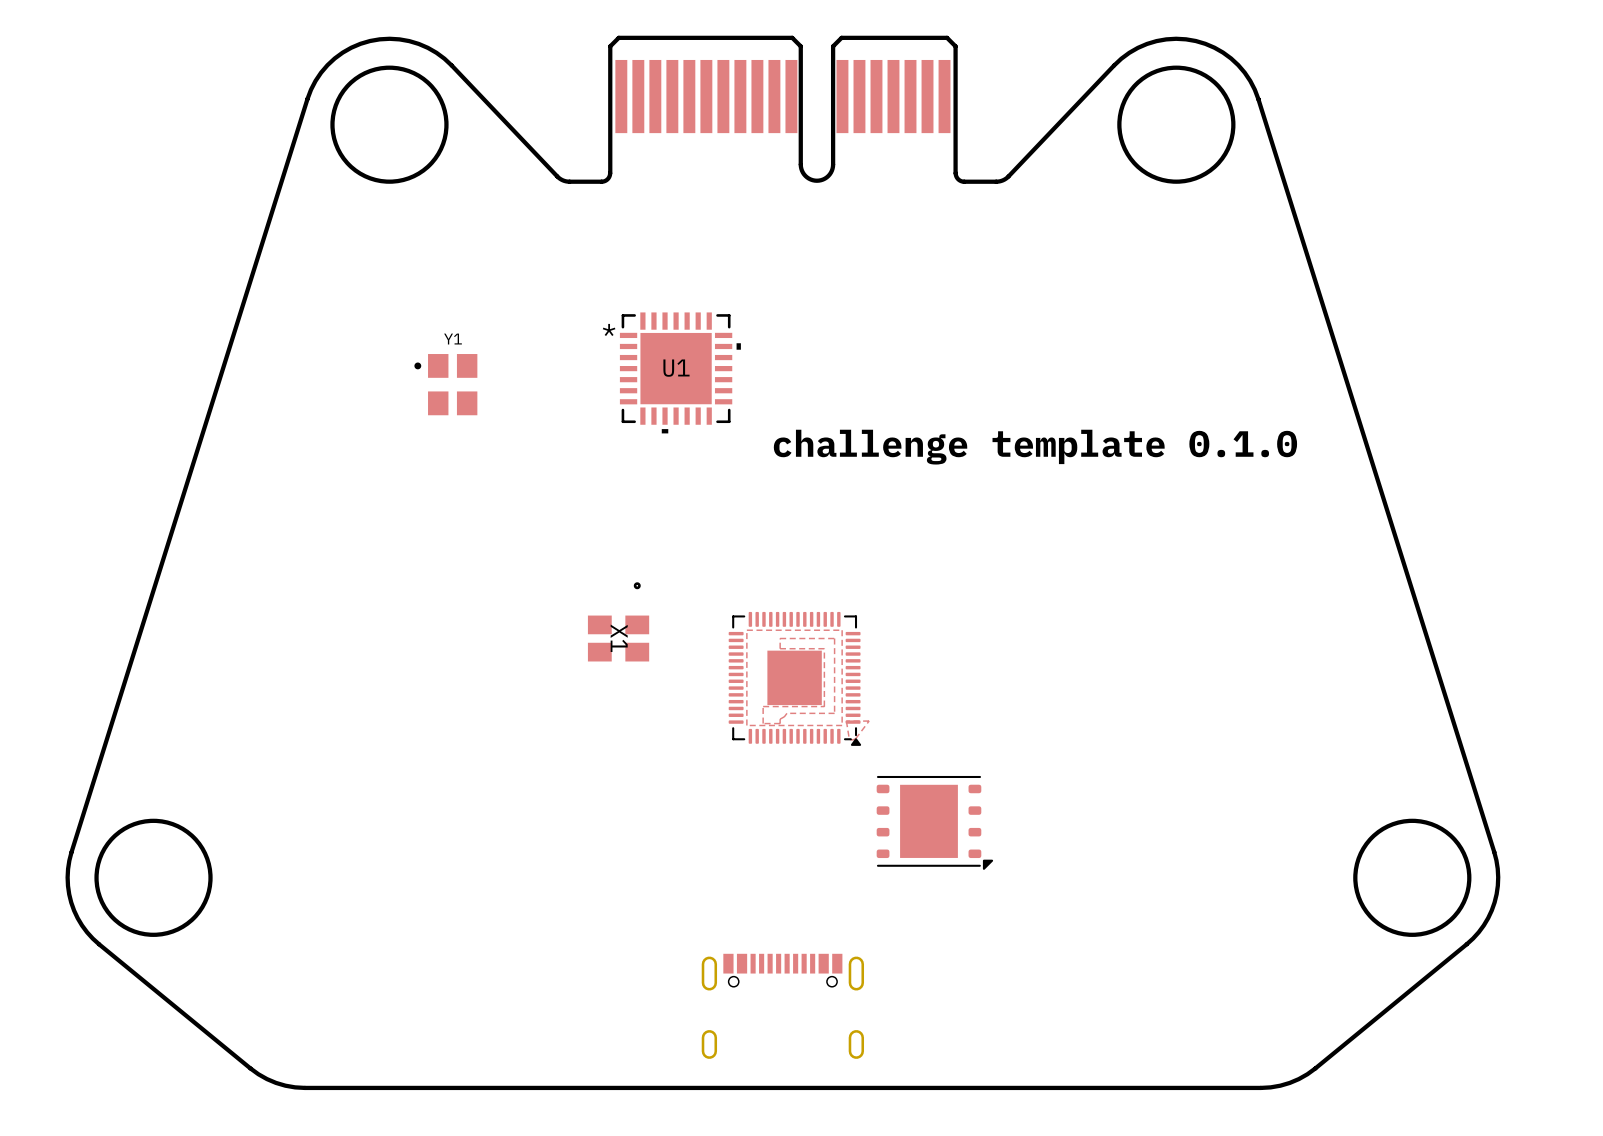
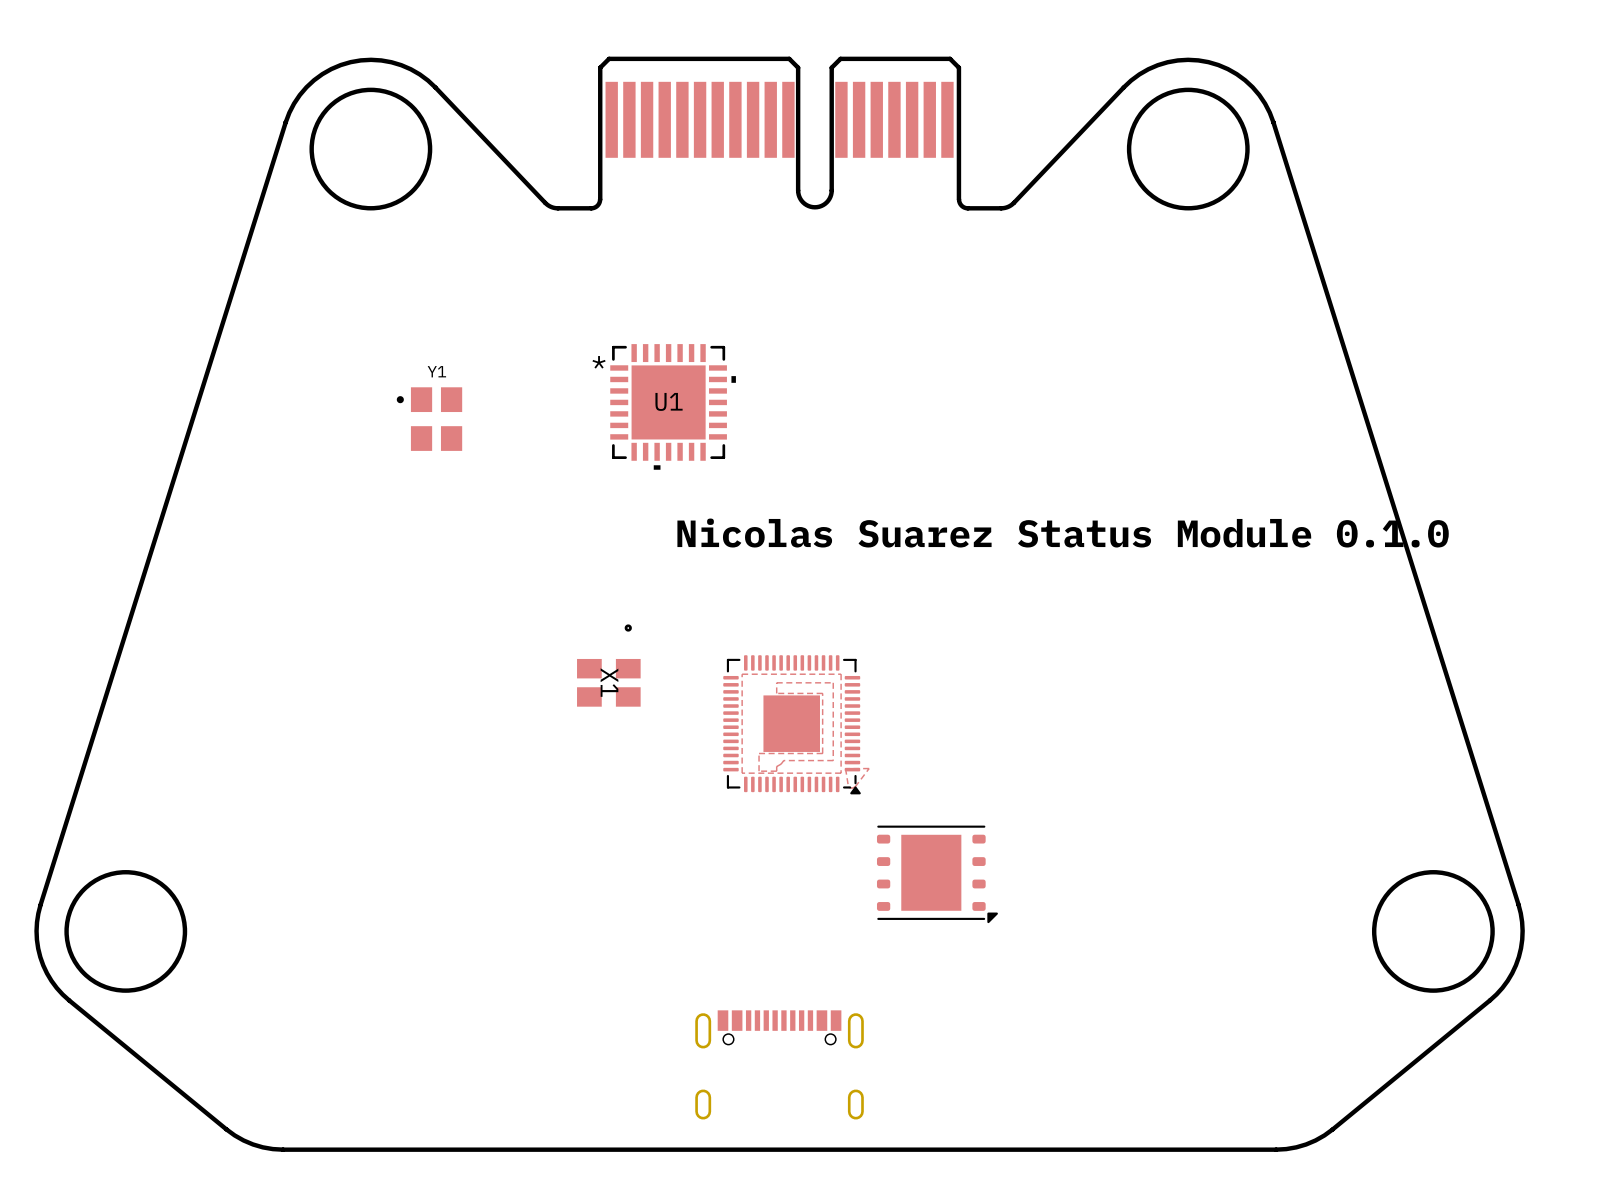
text: challenge template 0.1.0 (1035, 447) -> none
text: none -> Nicolas Suarez Status Module 0.1.0 (1063, 533)

